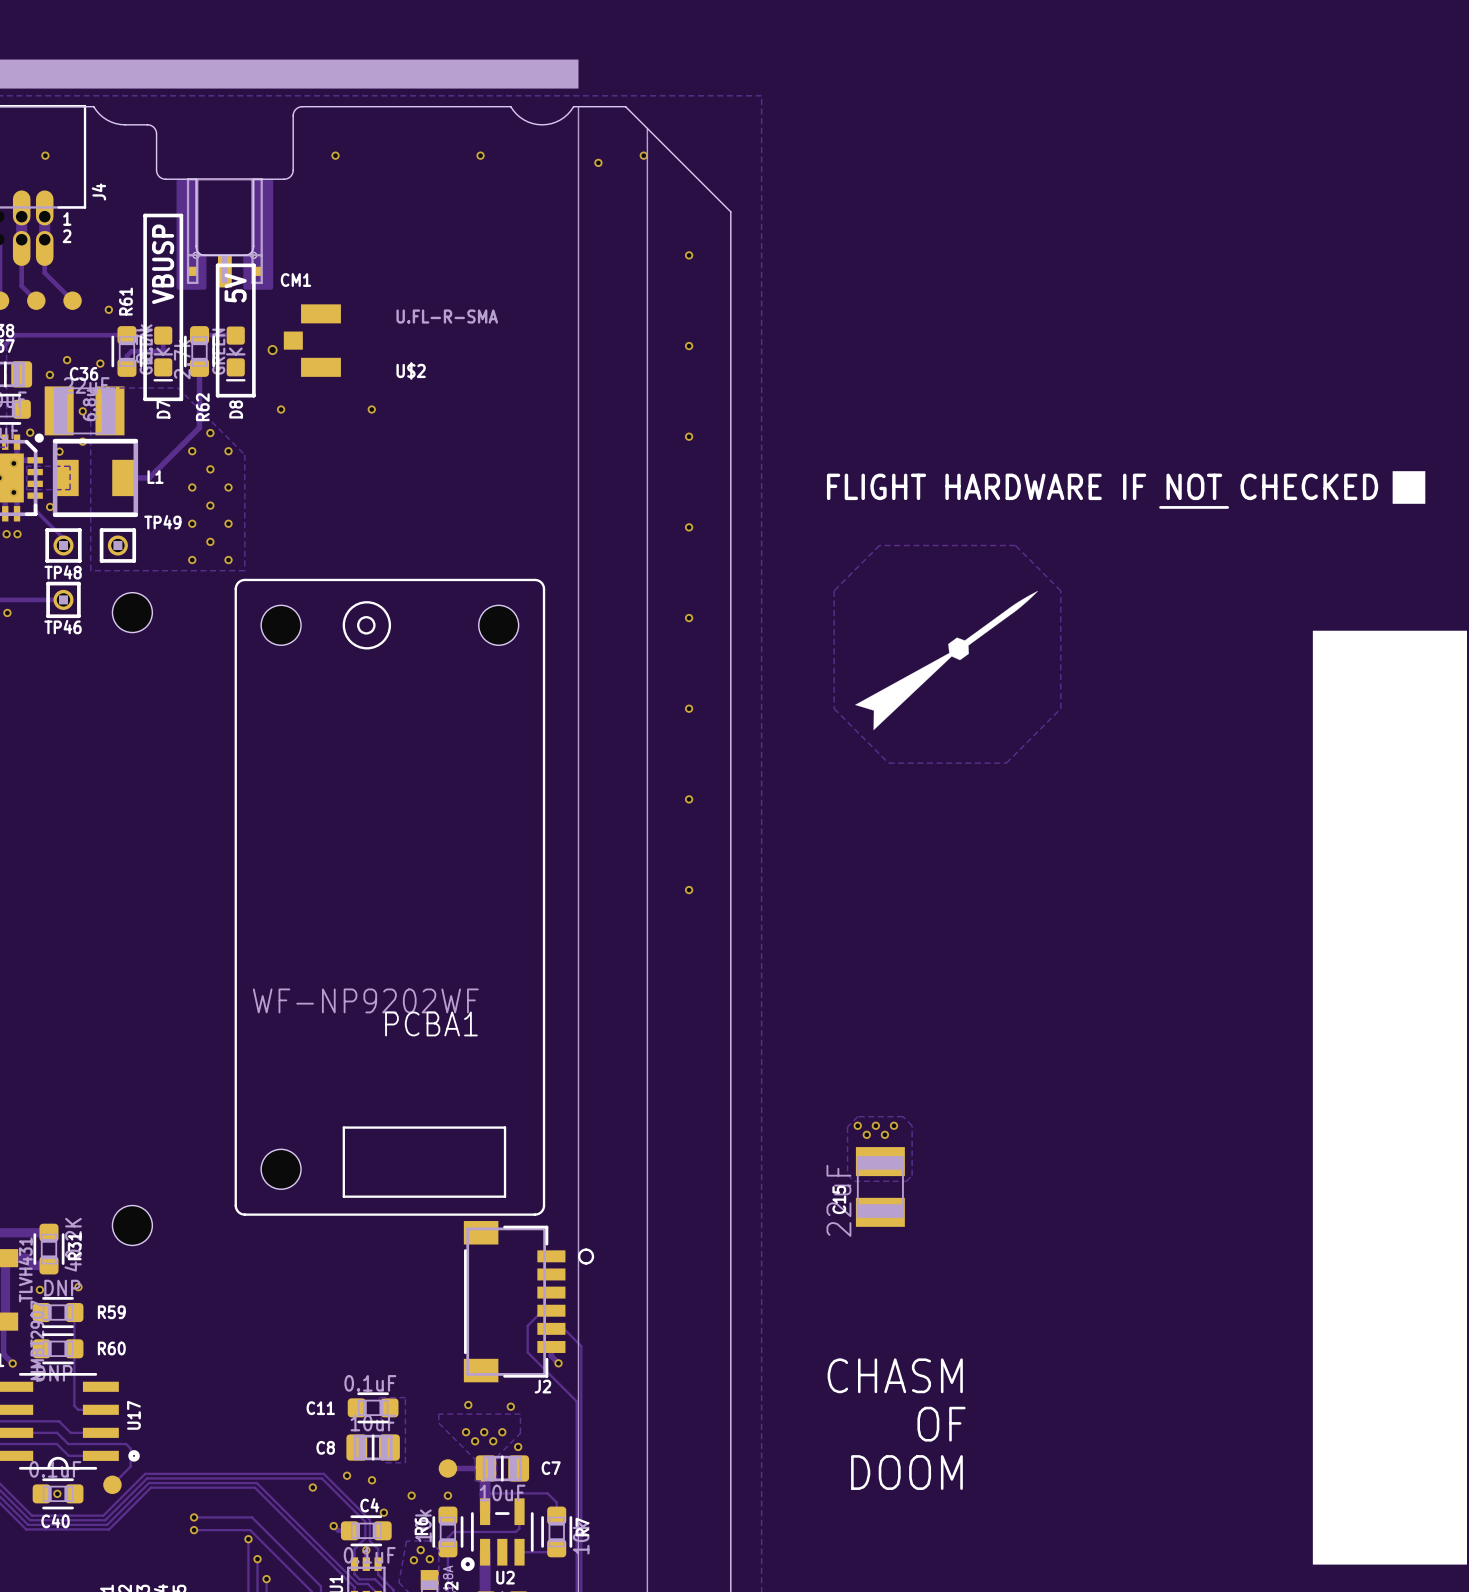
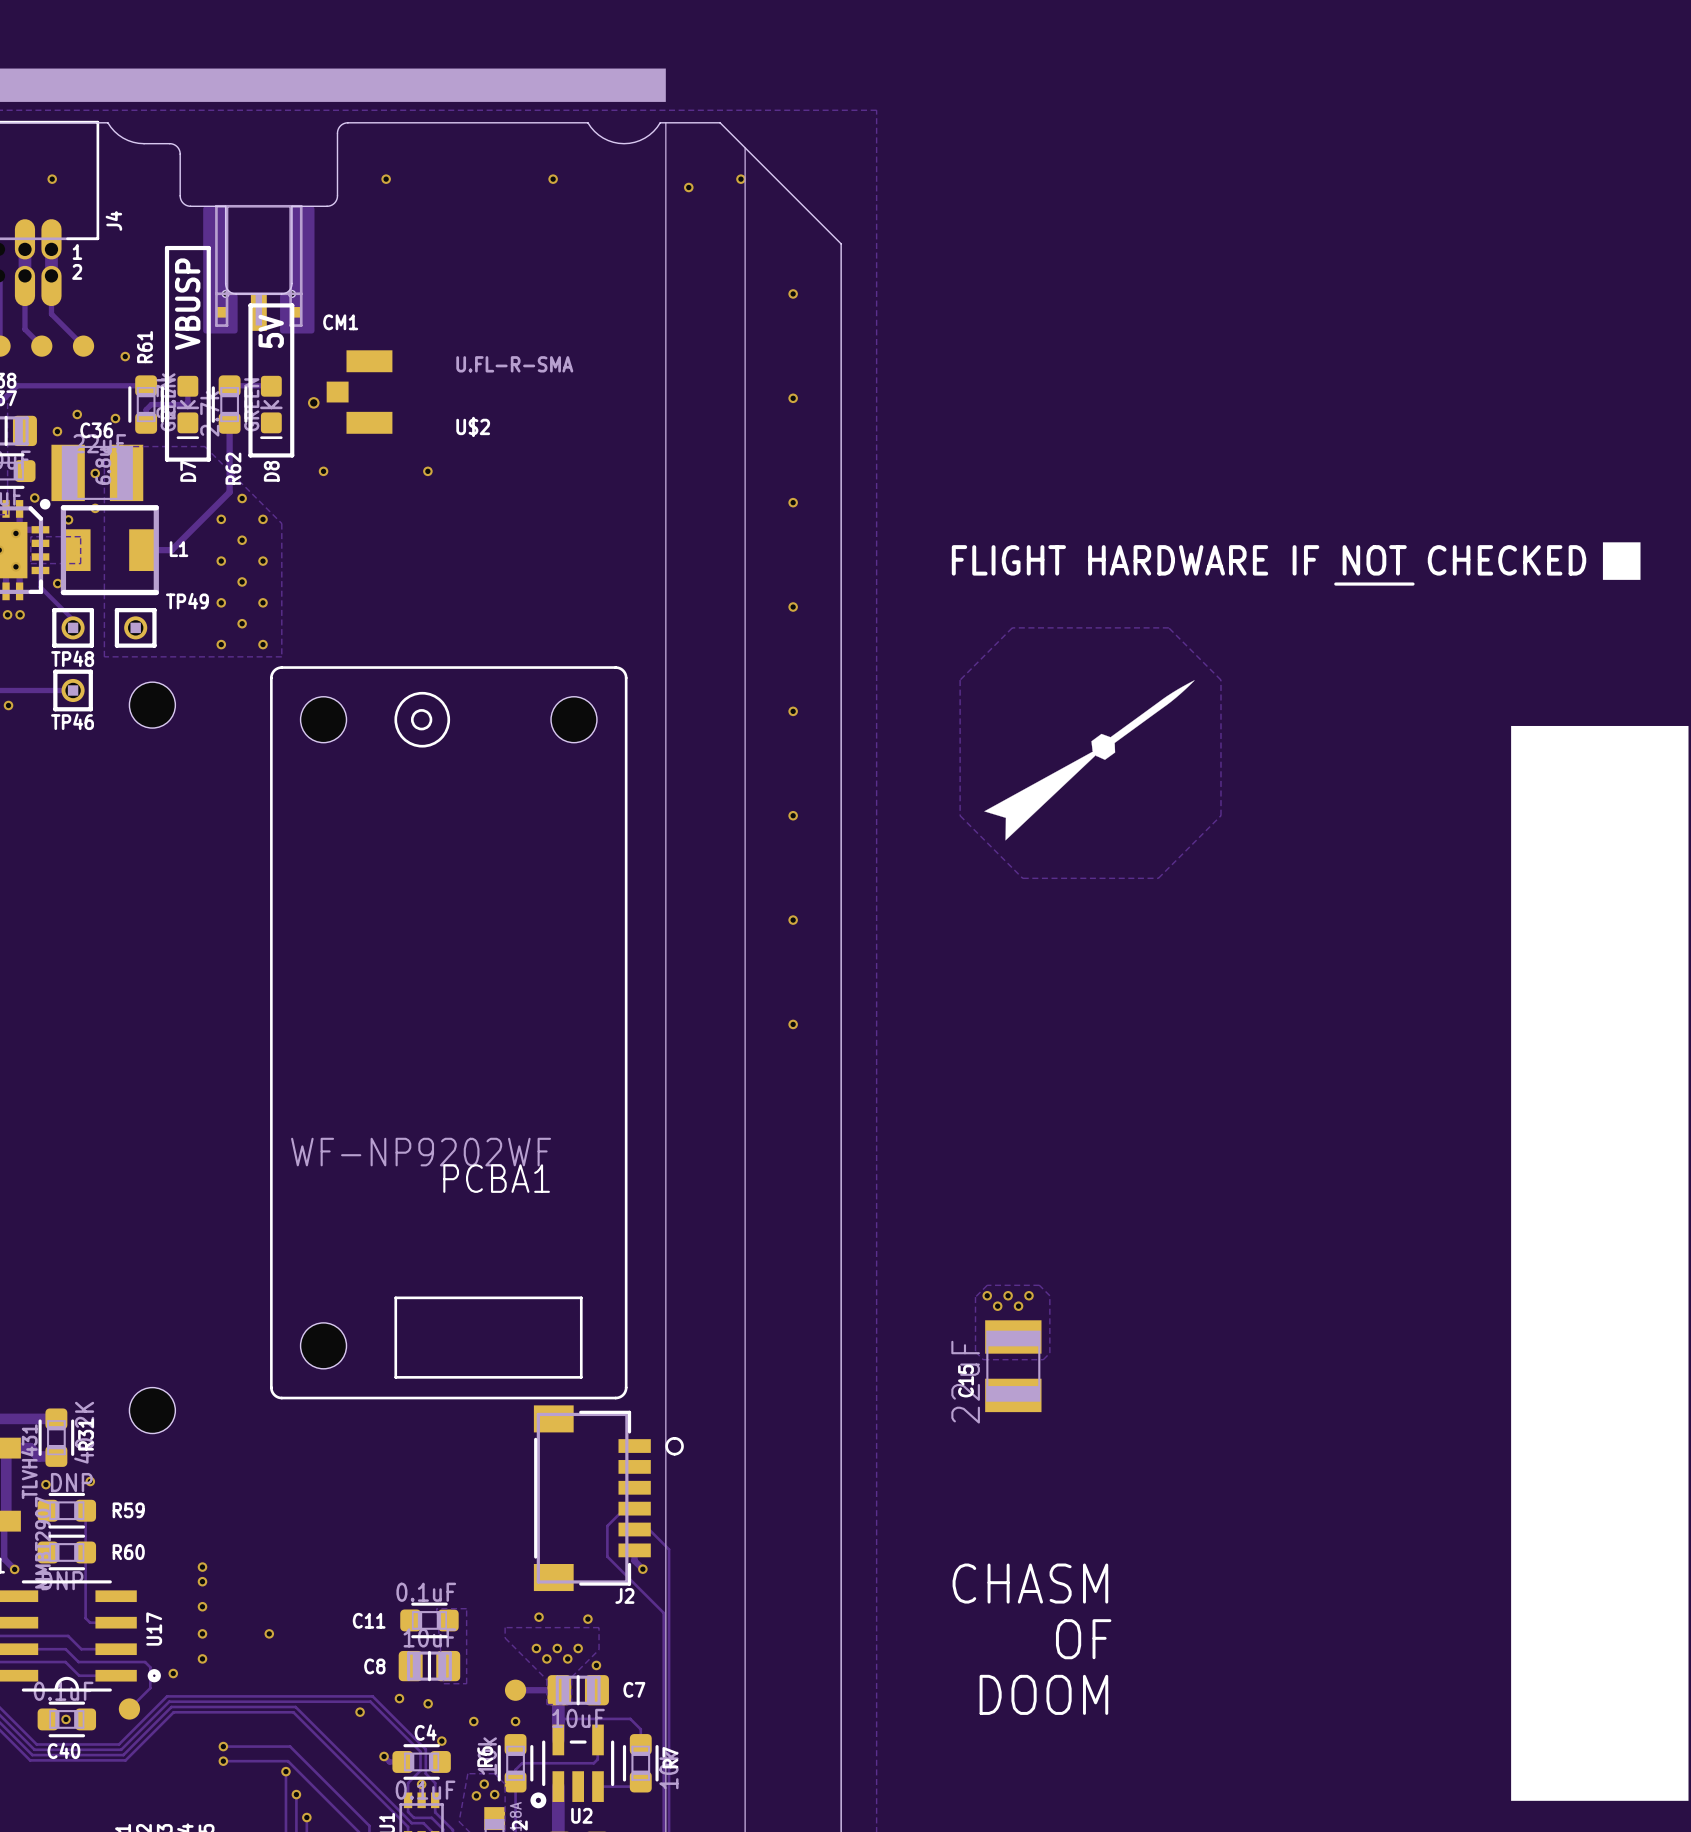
via: none -> (202, 1567)
via: none -> (202, 1581)
via: none -> (202, 1606)
via: none -> (202, 1633)
via: none -> (269, 1633)
via: none -> (202, 1658)
via: none -> (173, 1673)

